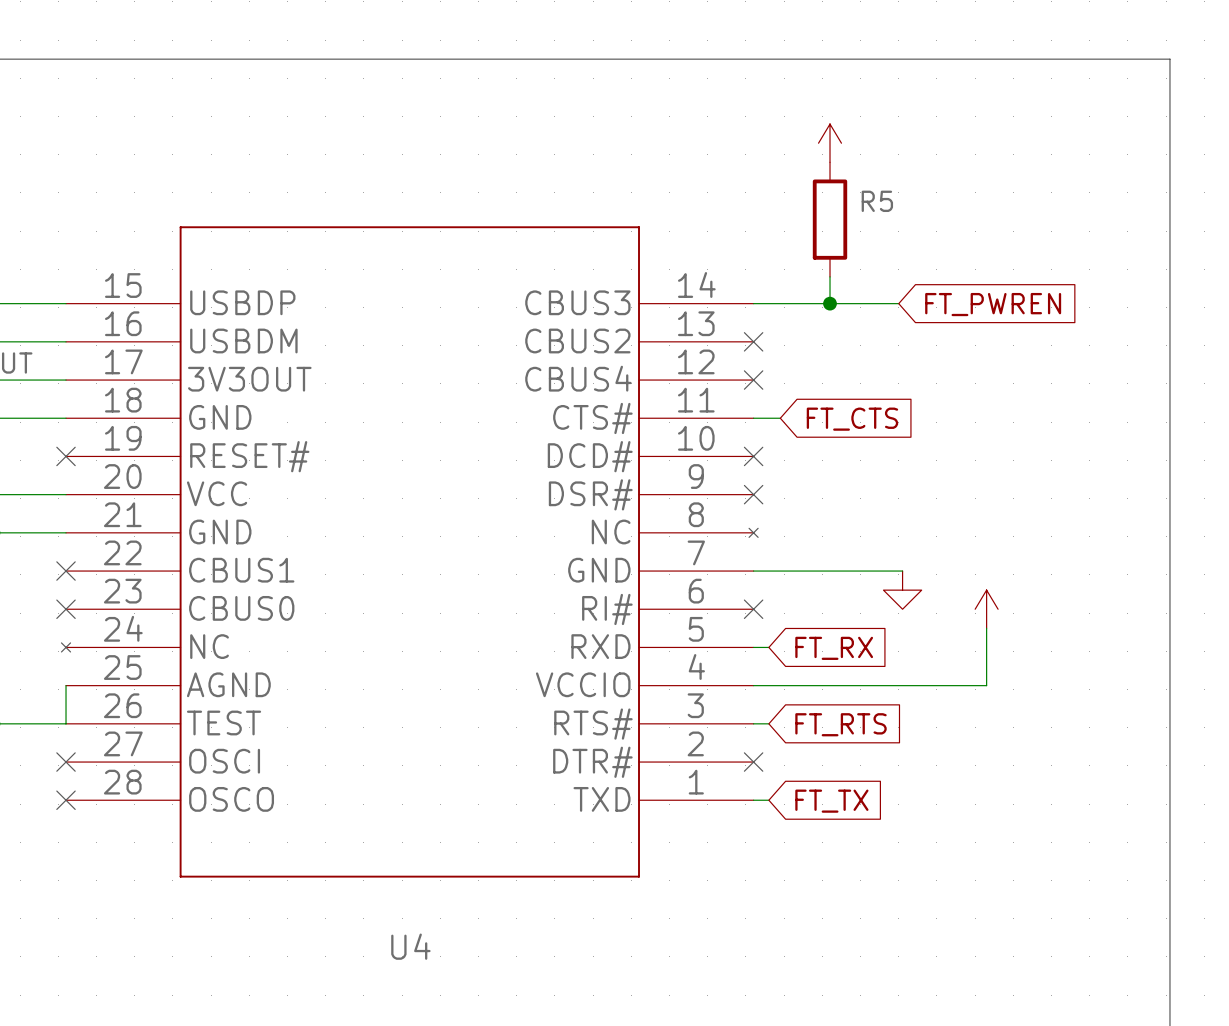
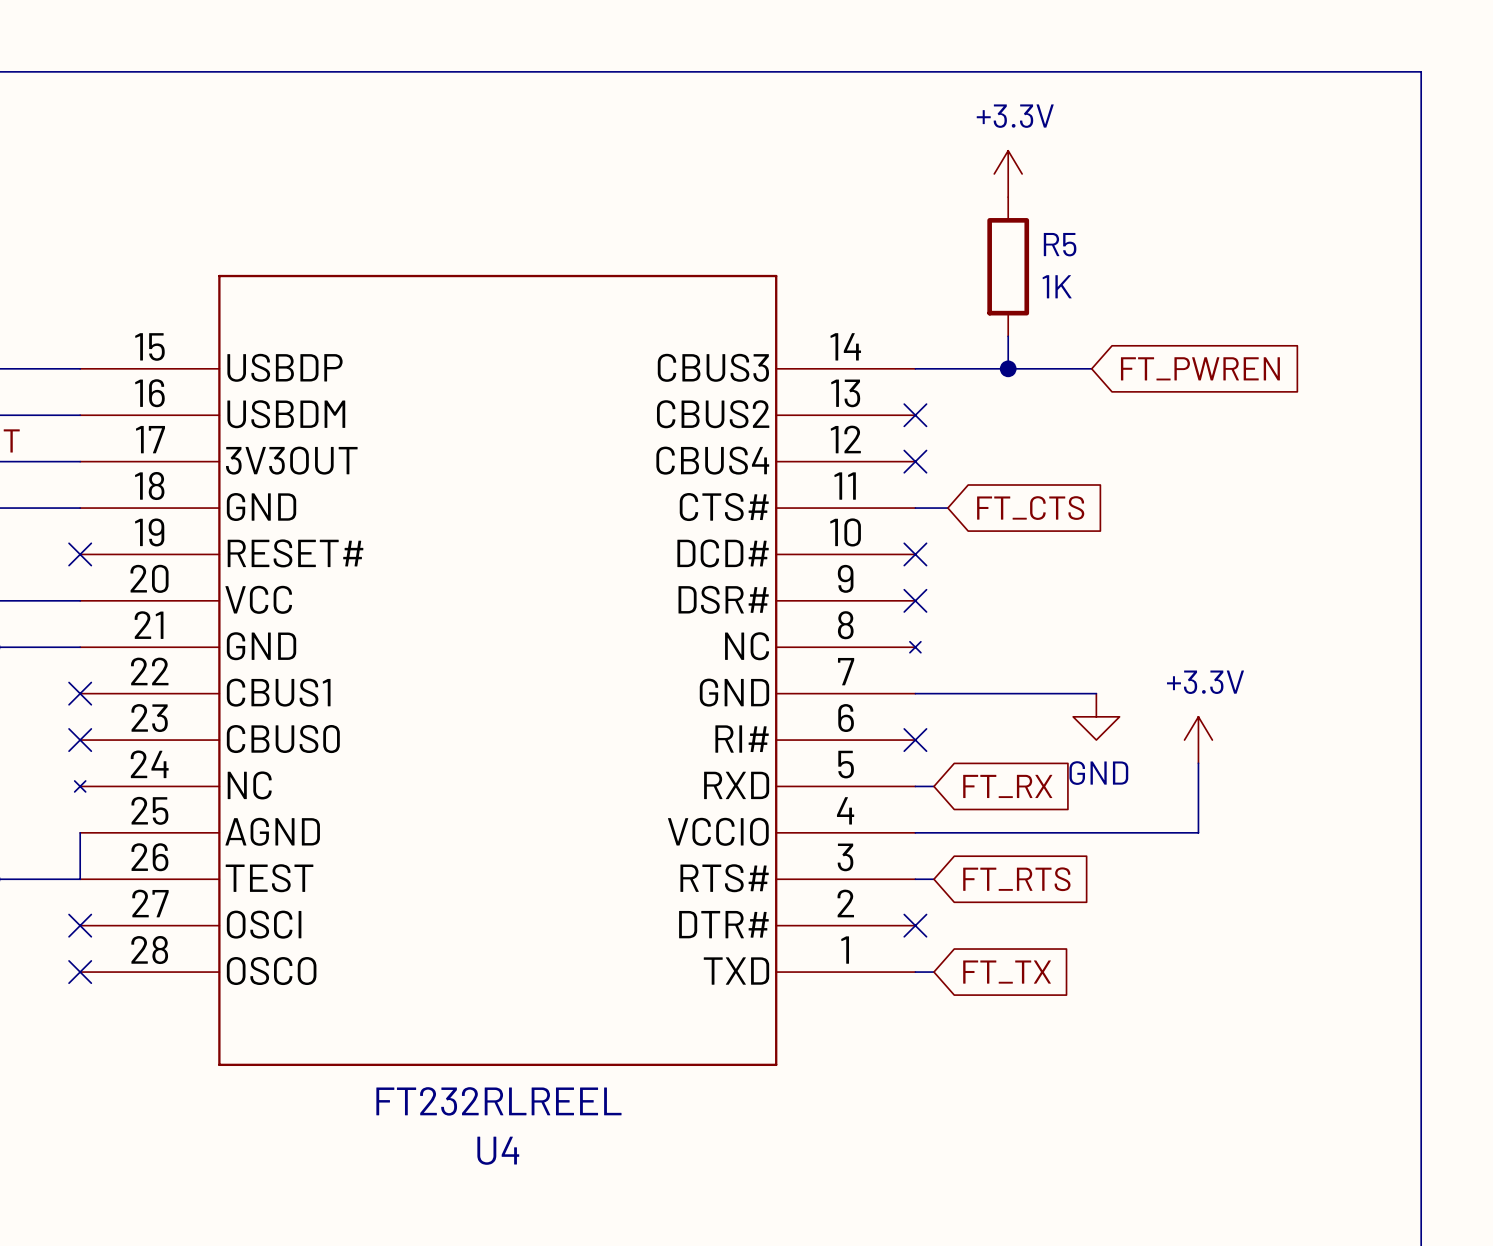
power symbol text: none -> +3.3V (1015, 116)
R5 value: none -> 1K (1057, 286)
power symbol text: none -> +3.3V (1205, 682)
power symbol text: none -> GND (1098, 773)
U4 value: none -> FT232RLREEL (498, 1101)

